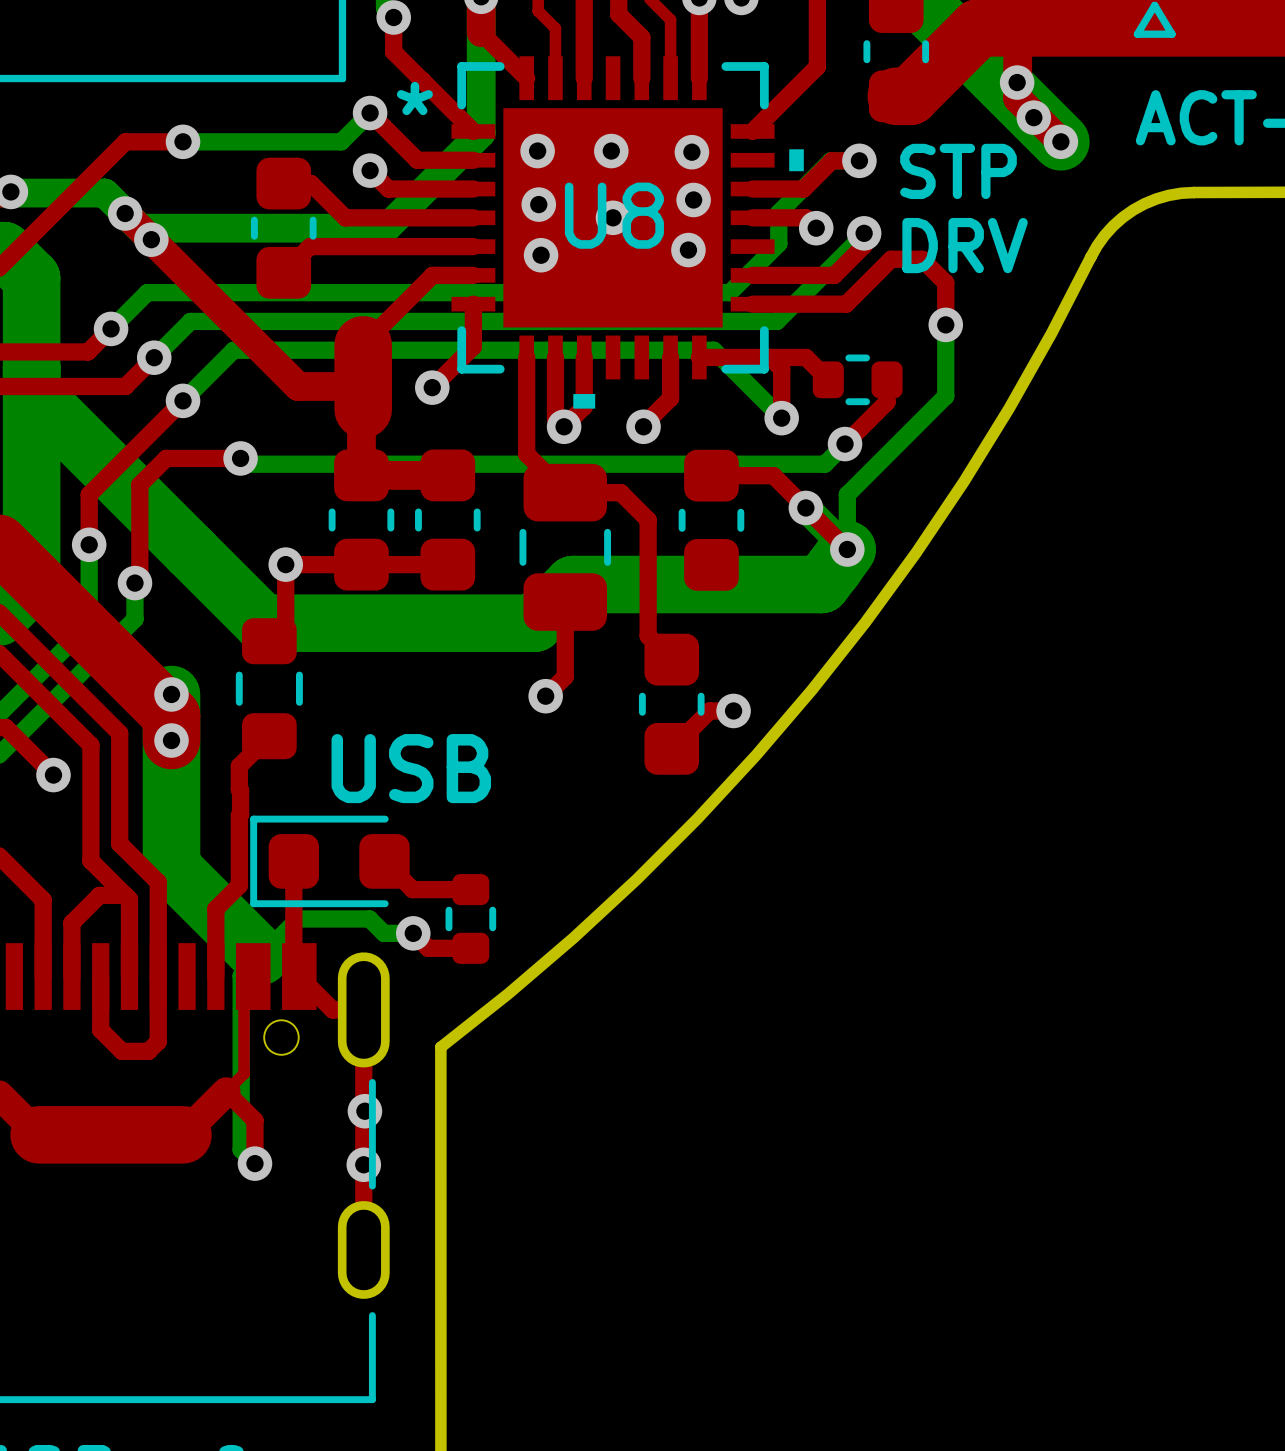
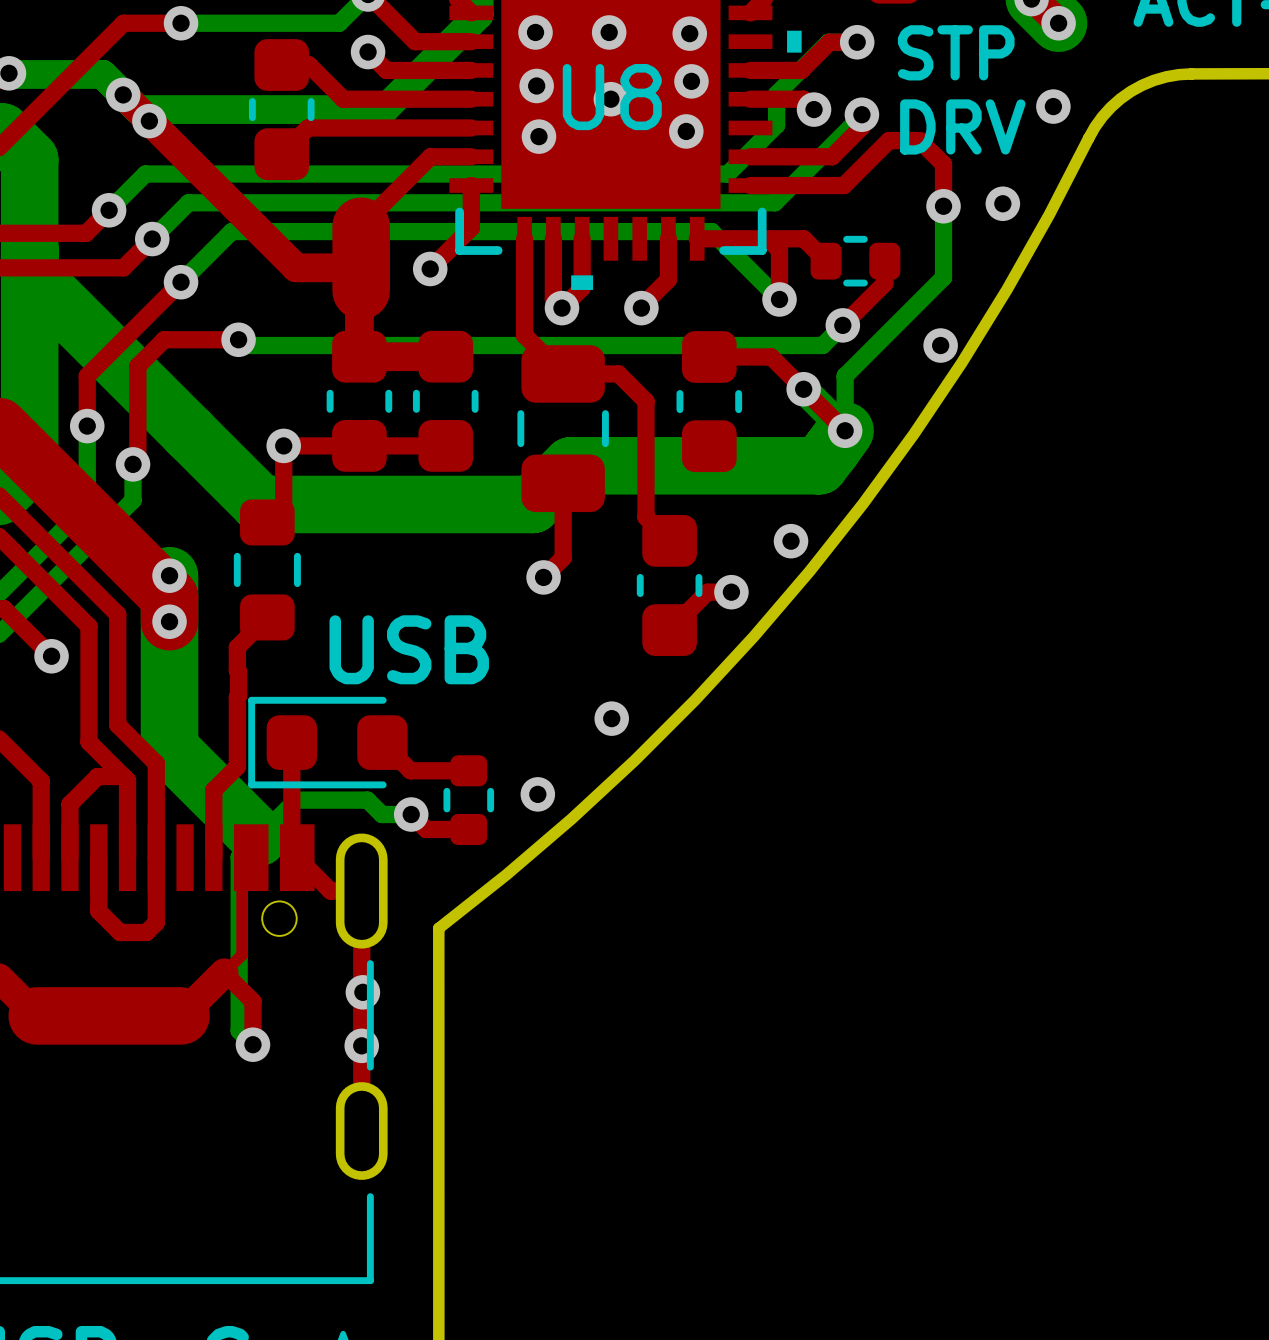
via: none -> (1053, 106)
via: none -> (1002, 203)
via: none -> (940, 345)
via: none -> (791, 541)
via: none -> (611, 718)
via: none -> (537, 794)

